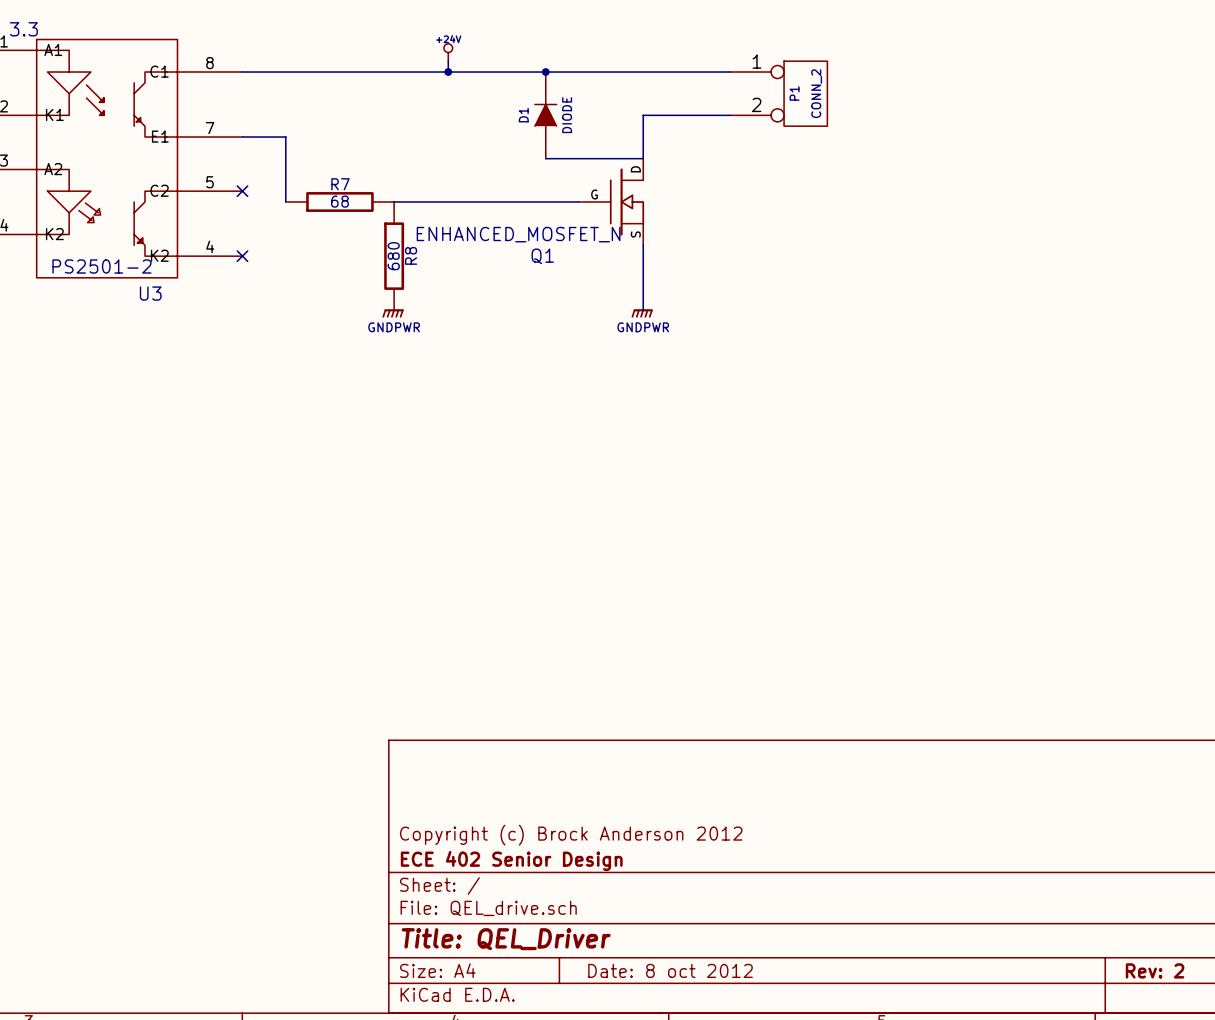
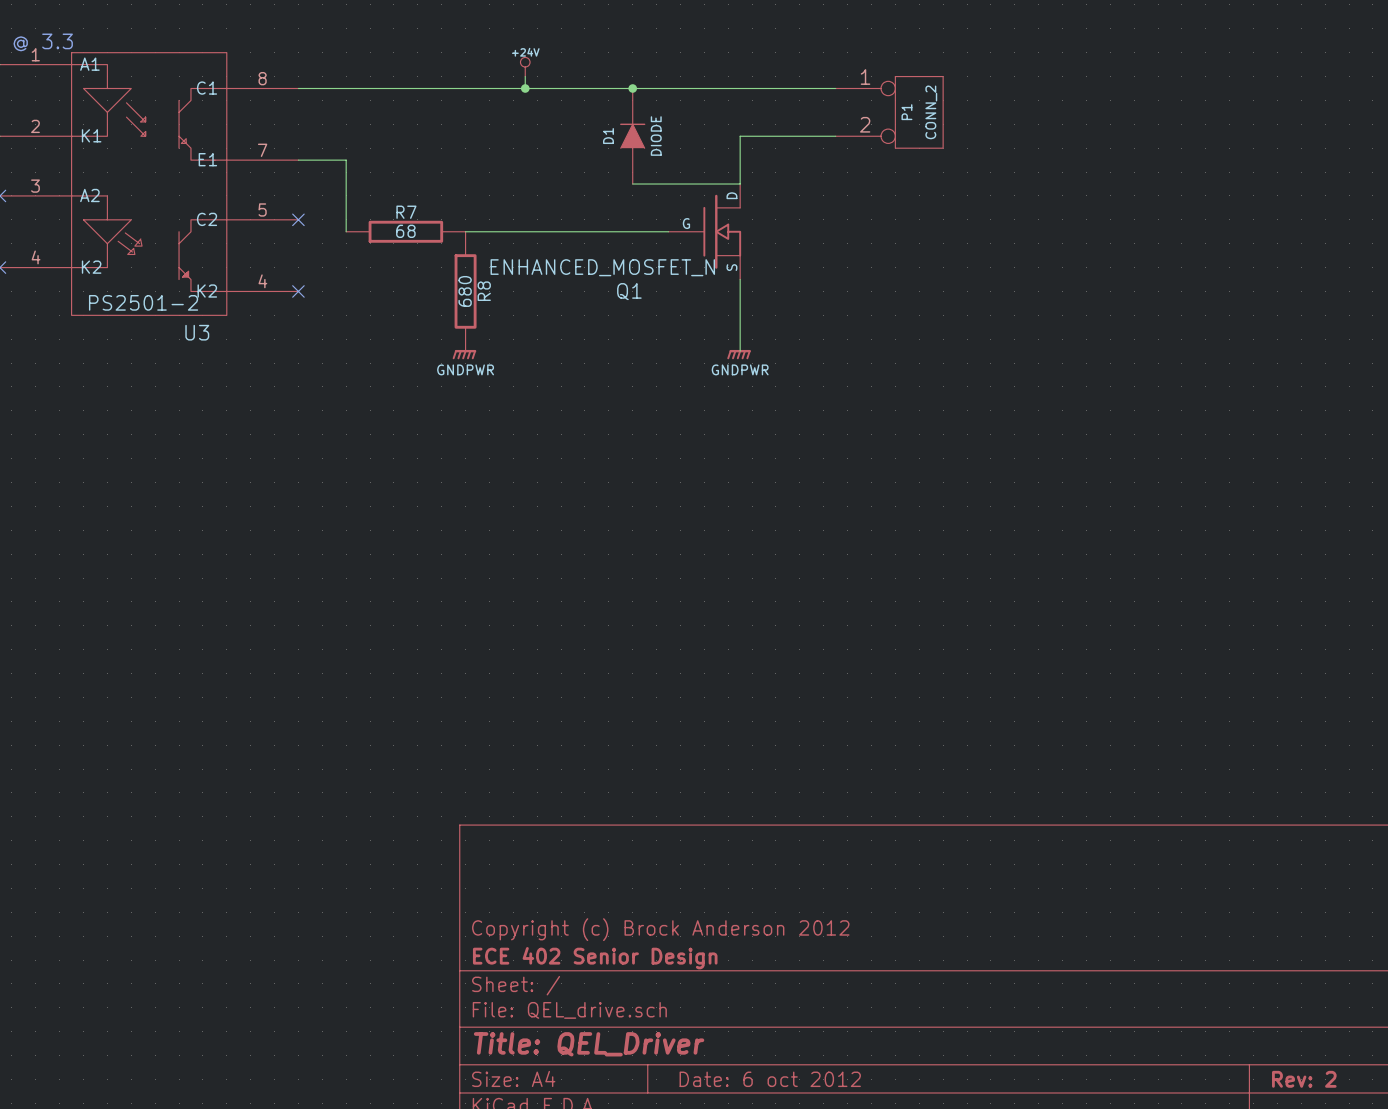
title block: Date: 8 oct 2012 (670, 970) -> Date: 6 oct 2012 (770, 1079)

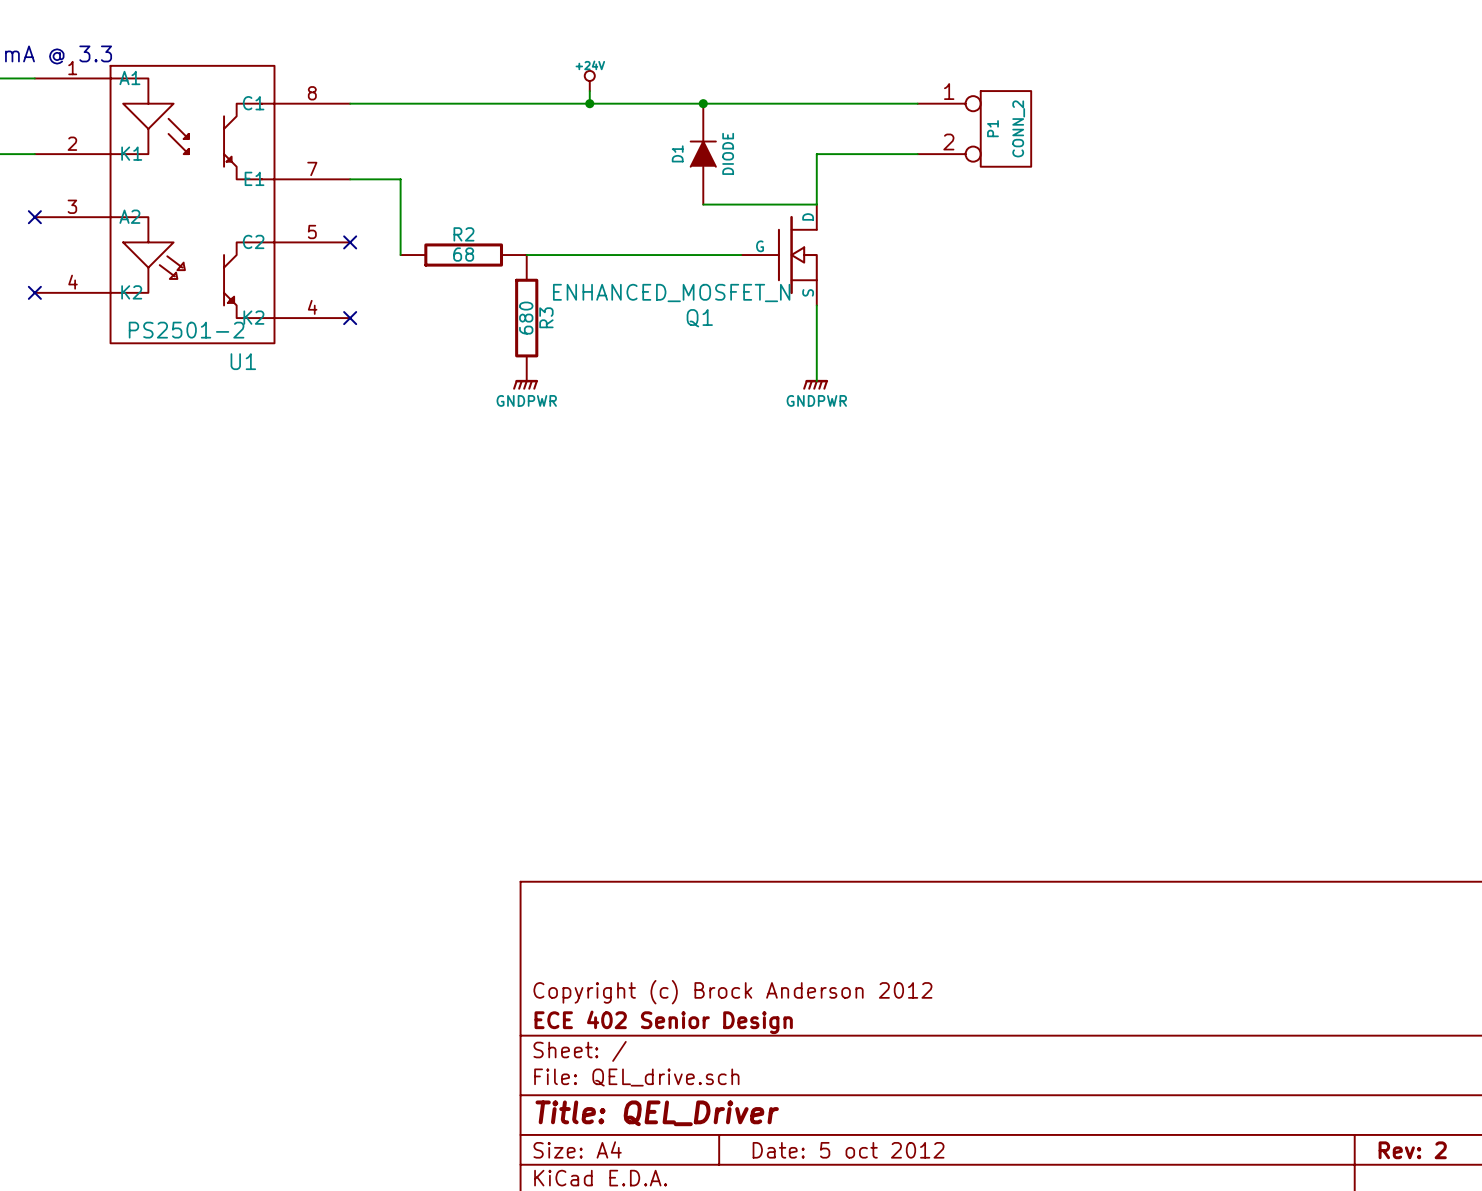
R7 name: R7 (406, 212) -> R2 (463, 234)
R8 name: R8 (484, 291) -> R3 (546, 317)
U3 name: U3 (197, 332) -> U1 (243, 361)
title block: Date: 6 oct 2012 (770, 1079) -> Date: 5 oct 2012 (848, 1150)

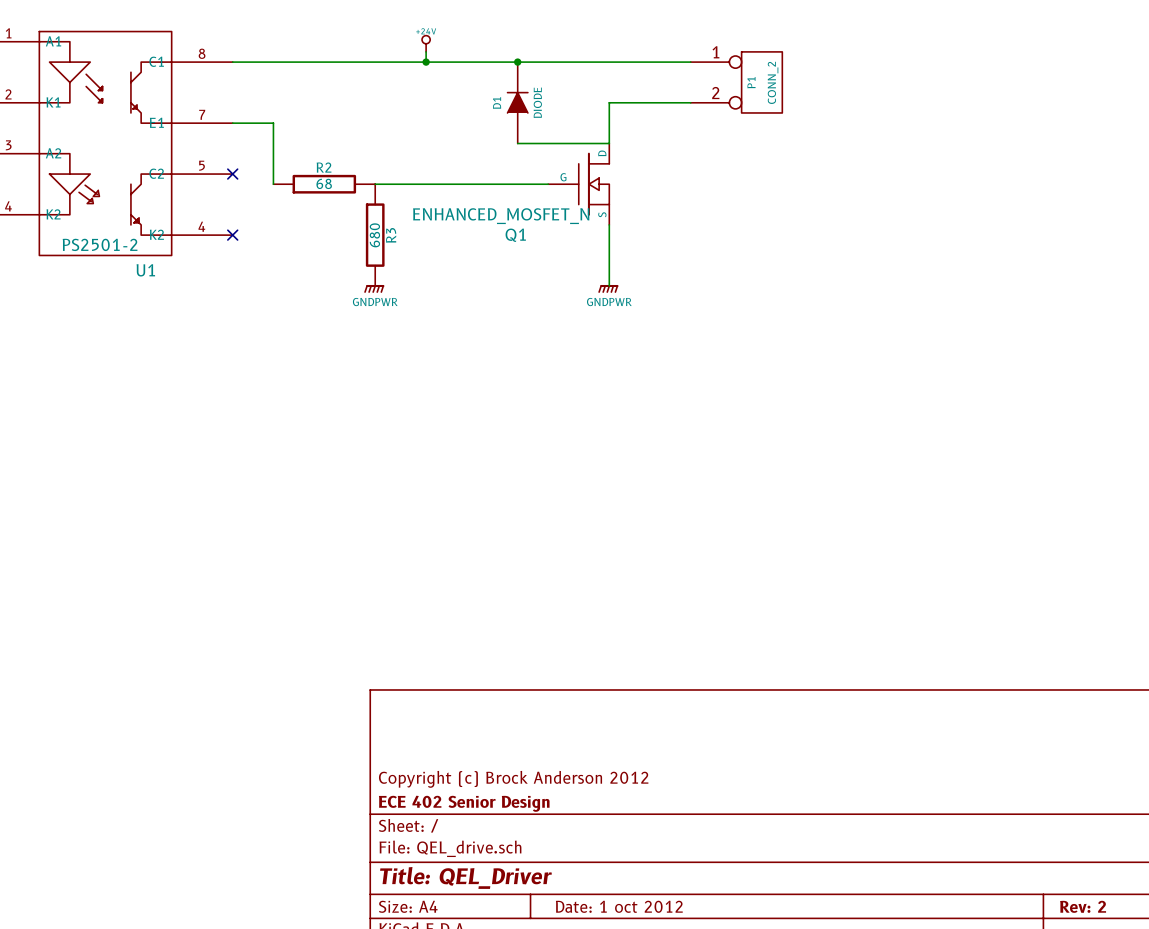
title block: Date: 5 oct 2012 (848, 1150) -> Date: 1 oct 2012 (619, 906)

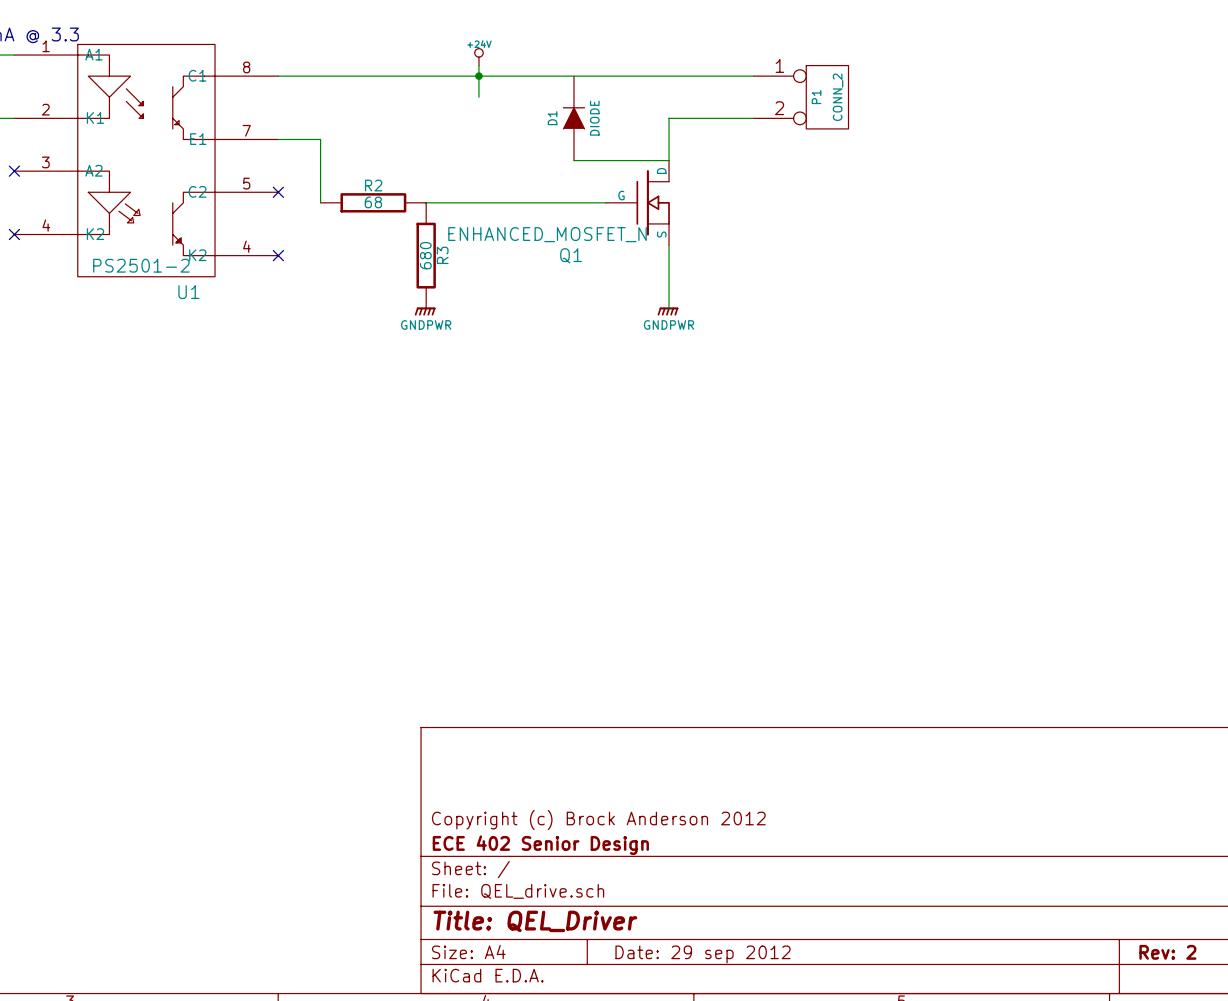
wire: none -> (478, 76) (478, 97)
junction: (517, 62) -> none
title block: Date: 1 oct 2012 (619, 906) -> Date: 29 sep 2012 (703, 954)

